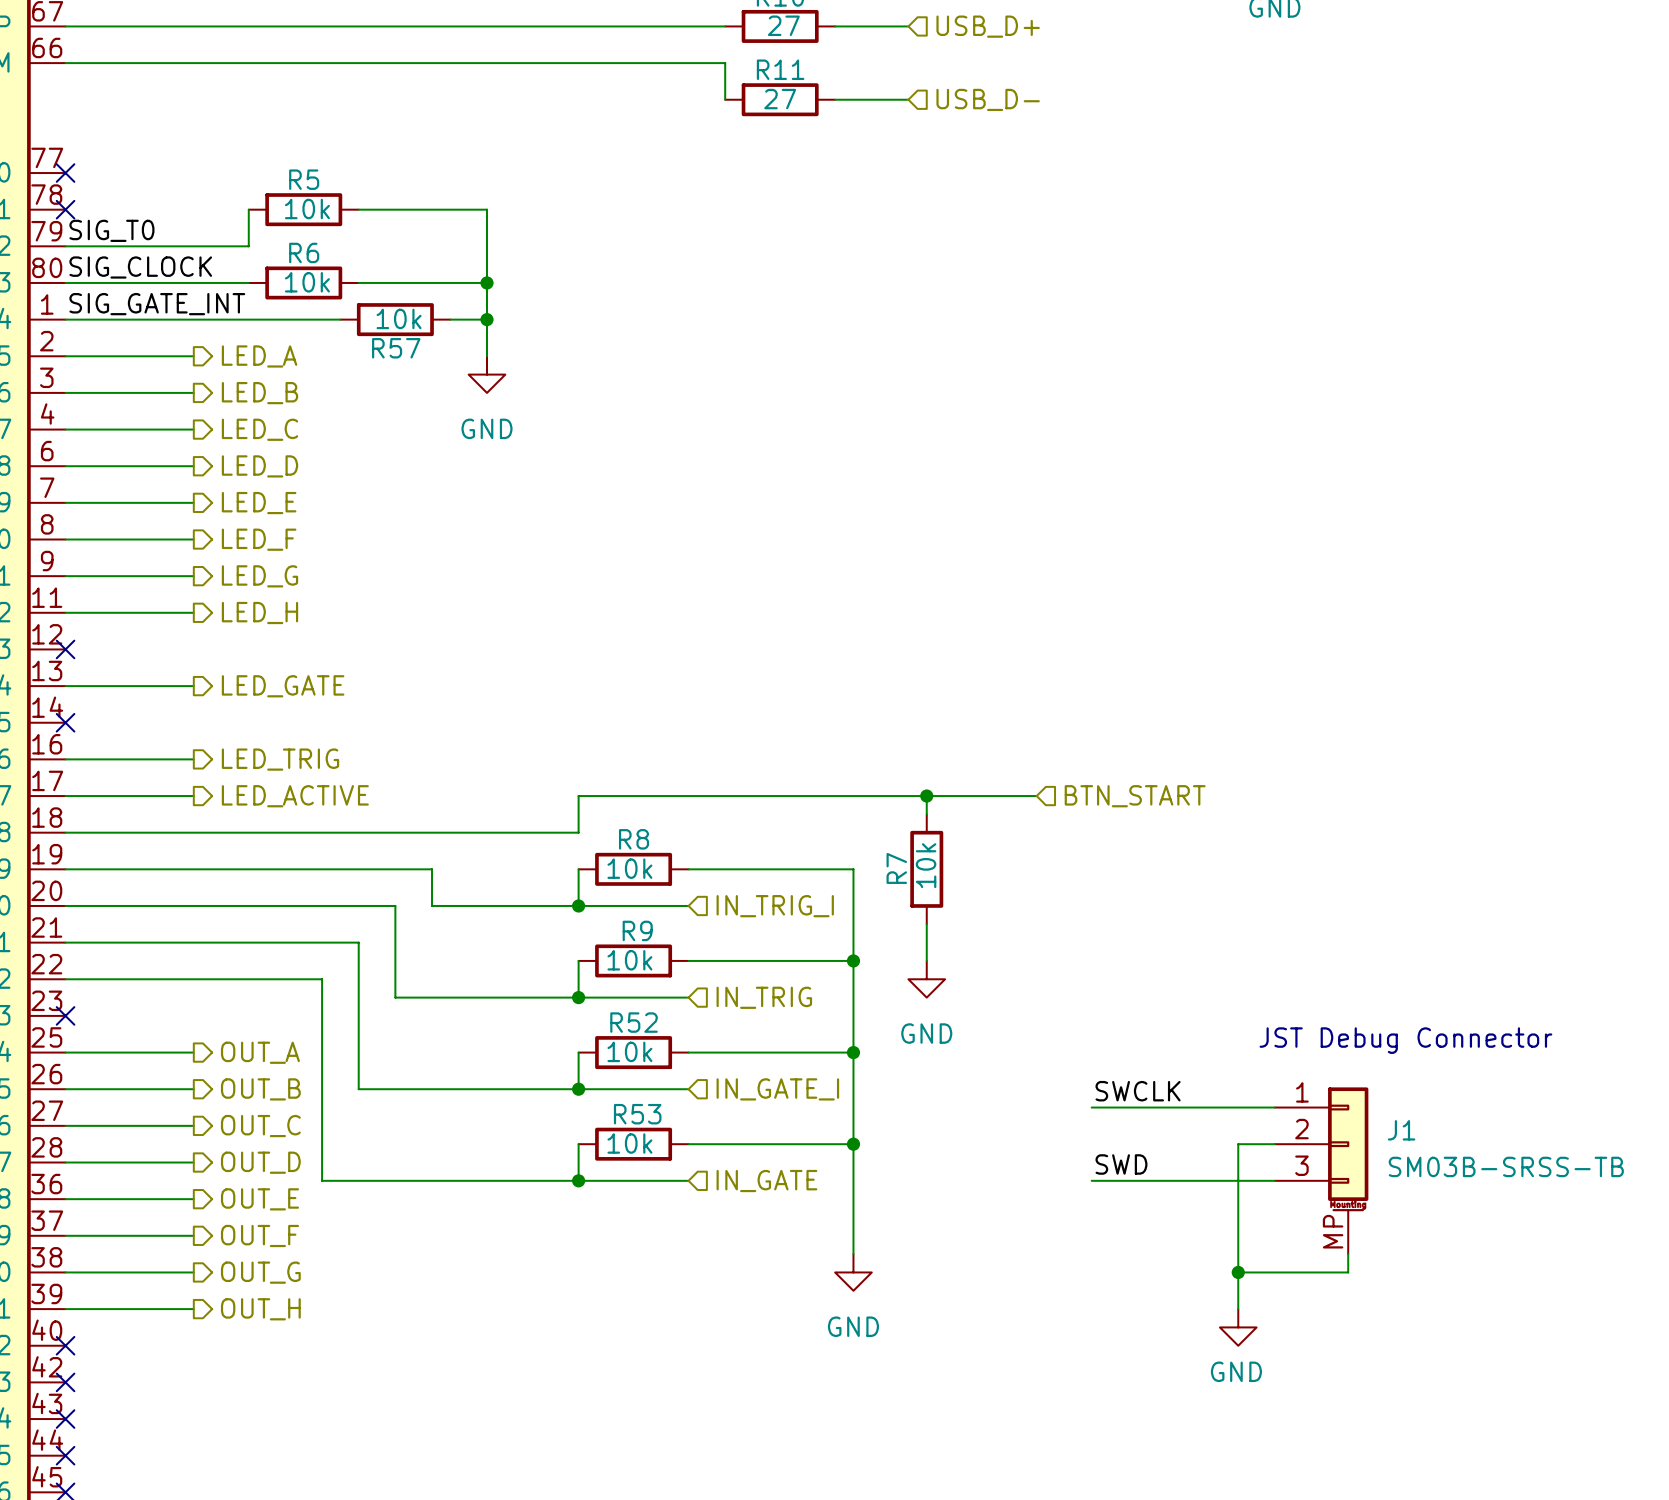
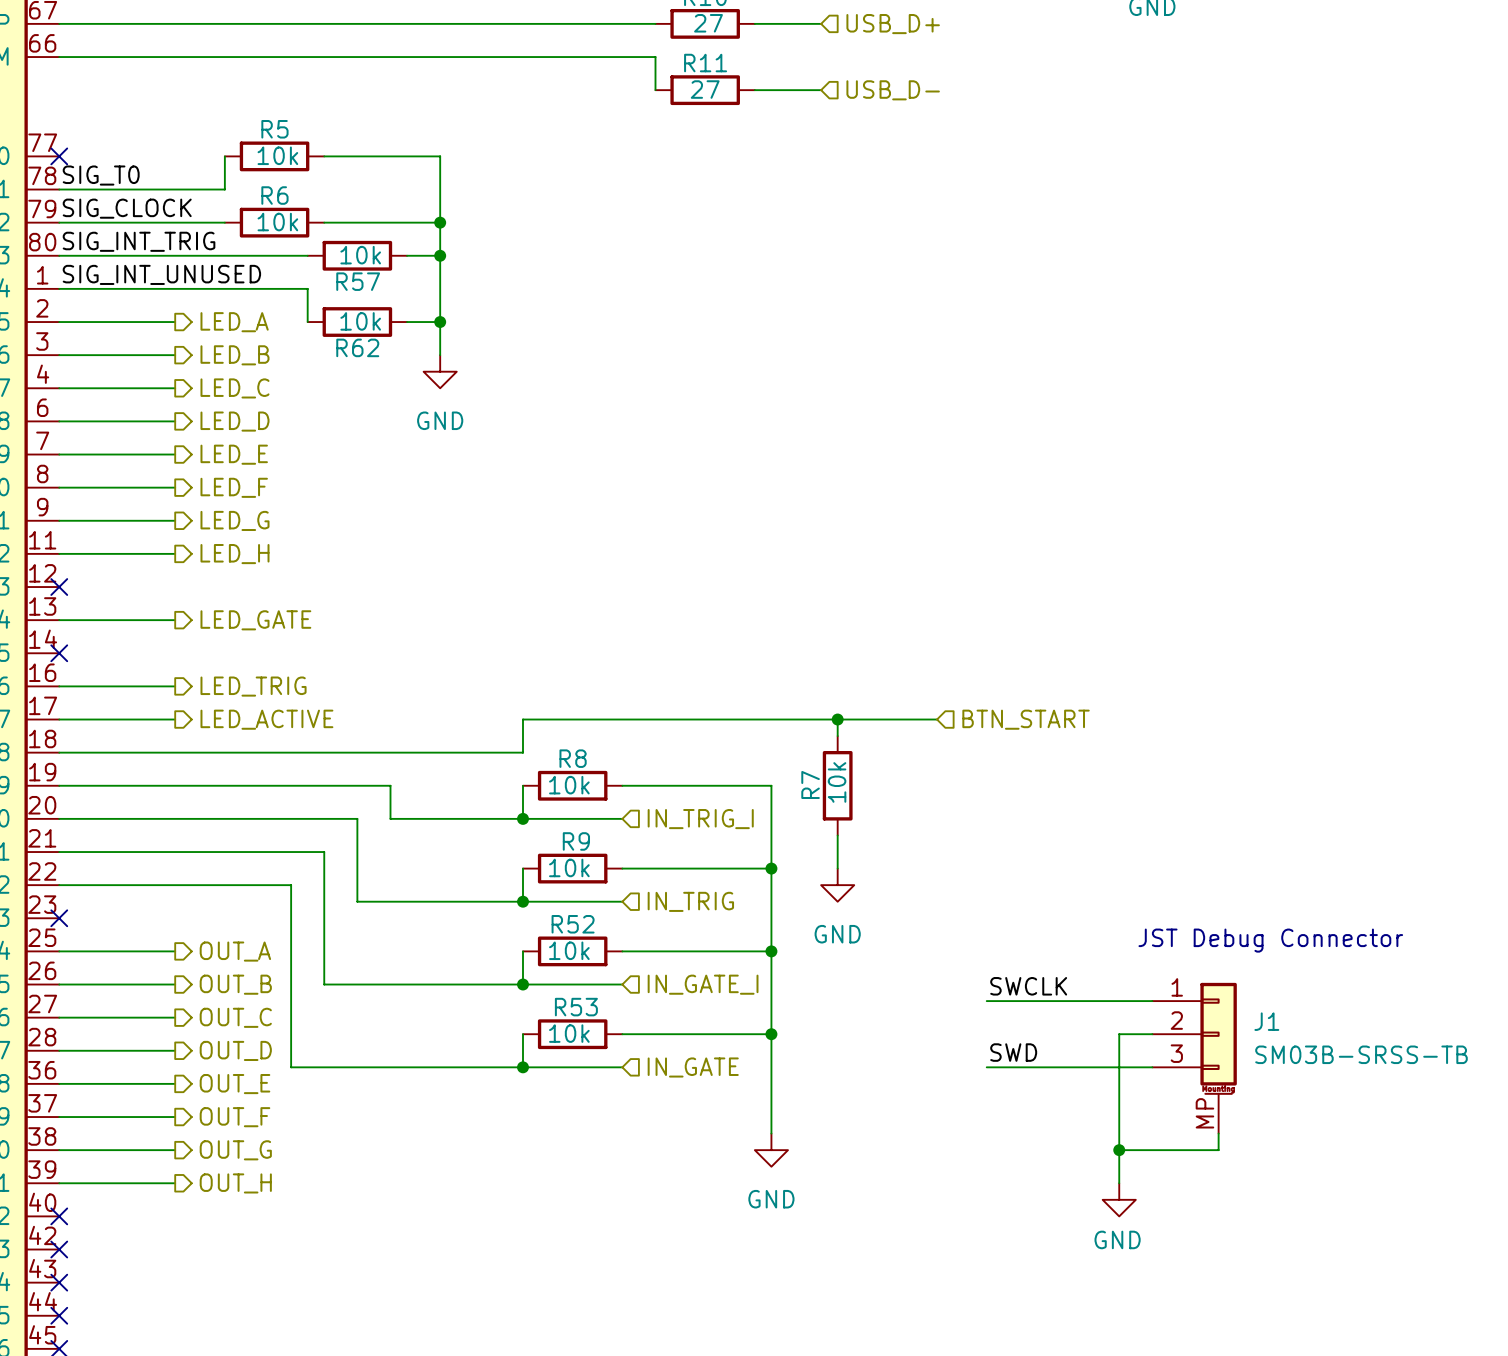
wire: none -> (224, 156) (224, 189) (59, 189)
label: none -> SIG_T0 (101, 175)
no-connect mark: (65, 209) -> none
wire: (248, 209) (248, 246) -> (307, 288) (307, 322)
R5 position: (303, 209) -> (274, 156)
wire: (358, 209) (486, 209) -> (324, 156) (440, 156) (440, 189)
label: SIG_T0 (111, 230) -> SIG_CLOCK (127, 208)
wire: none -> (324, 222) (440, 222)
junction: none -> (440, 222)
label: SIG_CLOCK (140, 267) -> SIG_INT_TRIG (139, 241)
R6 position: (303, 282) -> (274, 222)
wire: (358, 282) (450, 282) -> (224, 255) (307, 255)
label: SIG_GATE_INT (157, 304) -> SIG_INT_UNUSED (161, 274)
R57 position: (395, 319) -> (357, 255)
wire: (450, 319) (486, 319) -> none
junction: (486, 319) -> none
R62: none -> 10k (357, 322)
wire: none -> (407, 322) (440, 322) (440, 355)
junction: none -> (440, 322)
power symbol position: GND (486, 374) -> GND (440, 371)

